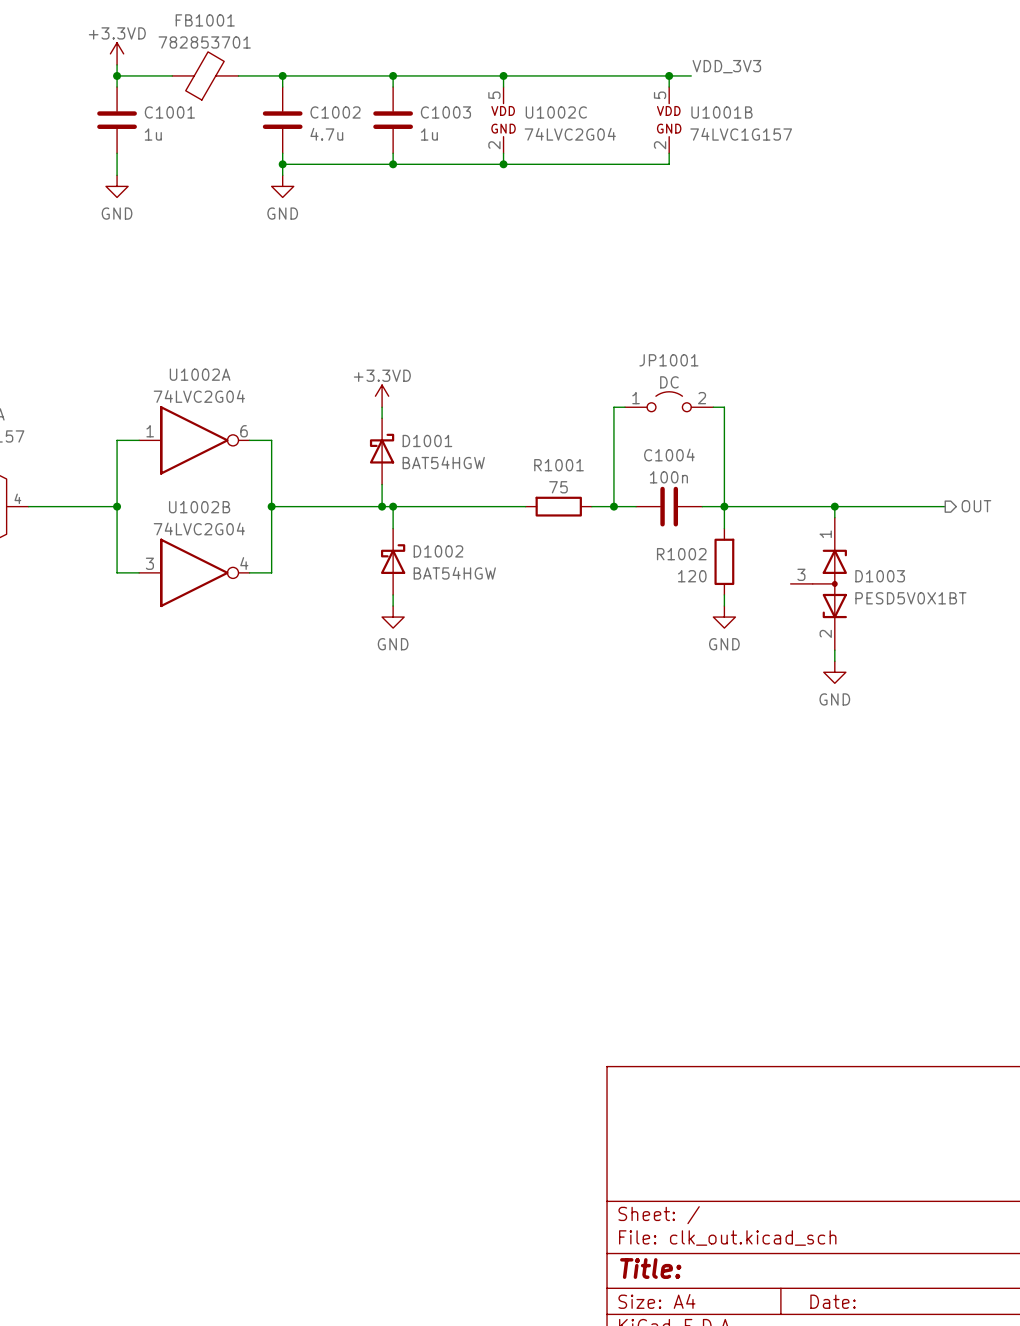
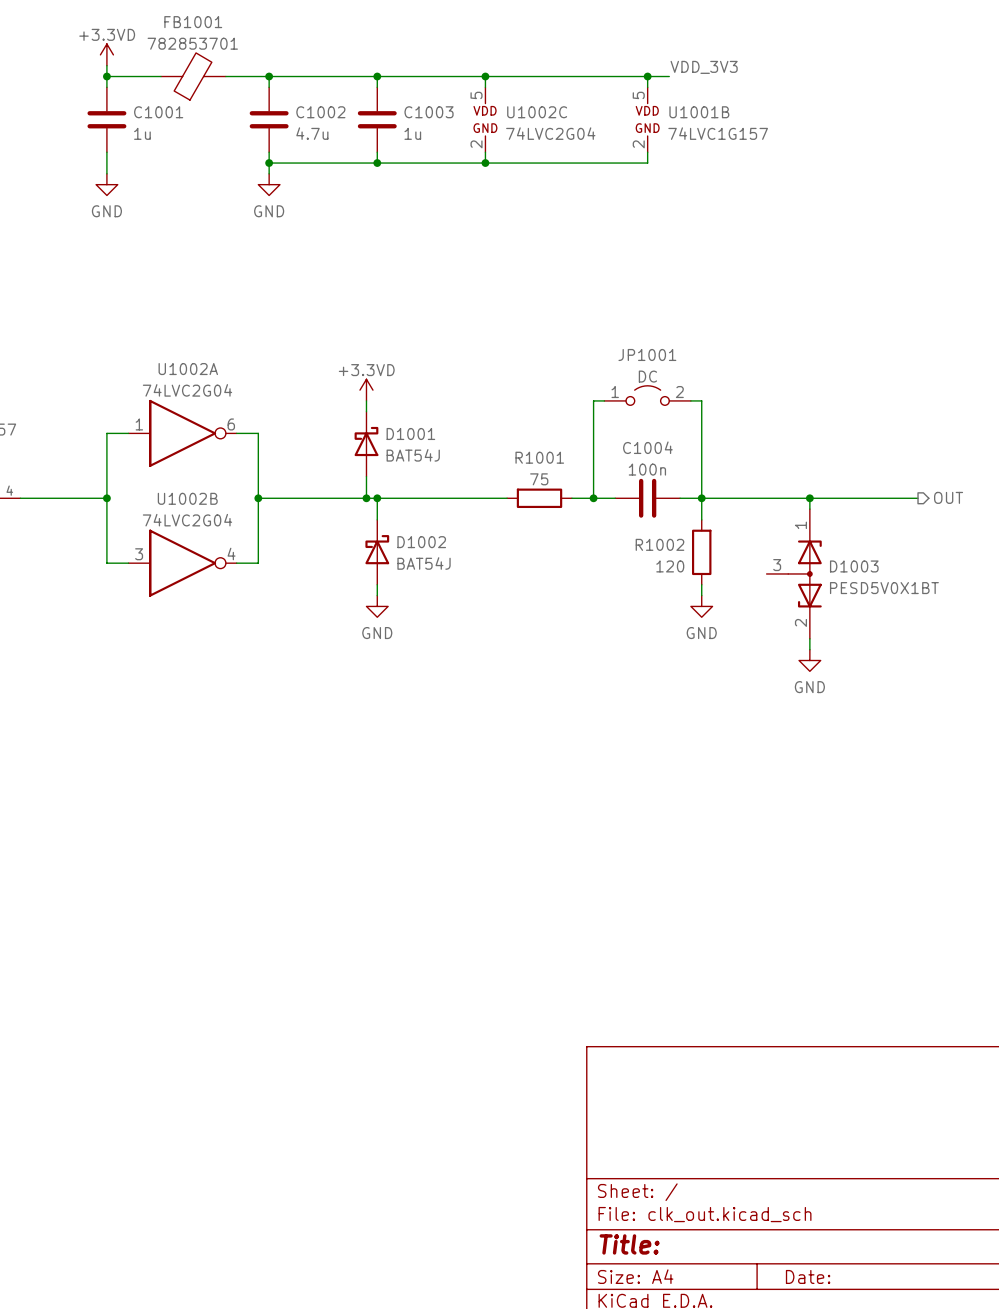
D1001 value: BAT54HGW (443, 462) -> BAT54J (413, 455)
D1002 value: BAT54HGW (454, 573) -> BAT54J (424, 563)

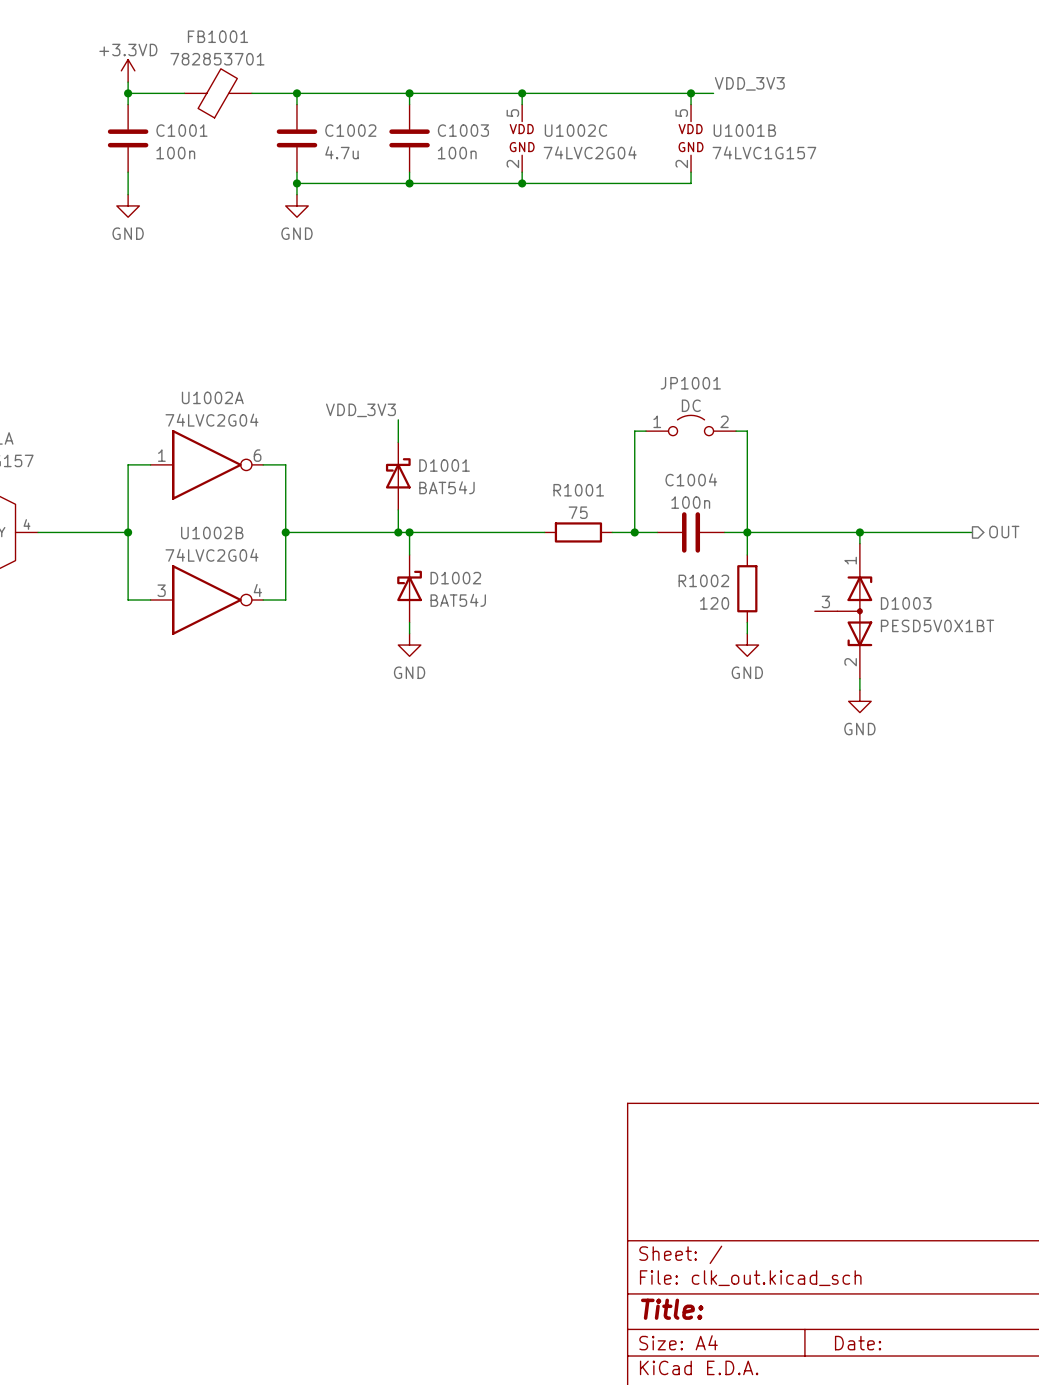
C1001 value: 1u (142, 133) -> 100n (175, 153)
C1003 value: 1u (412, 133) -> 100n (457, 153)
label: none -> VDD_3V3 (360, 410)
power symbol: +3.3VD (366, 390) -> none

